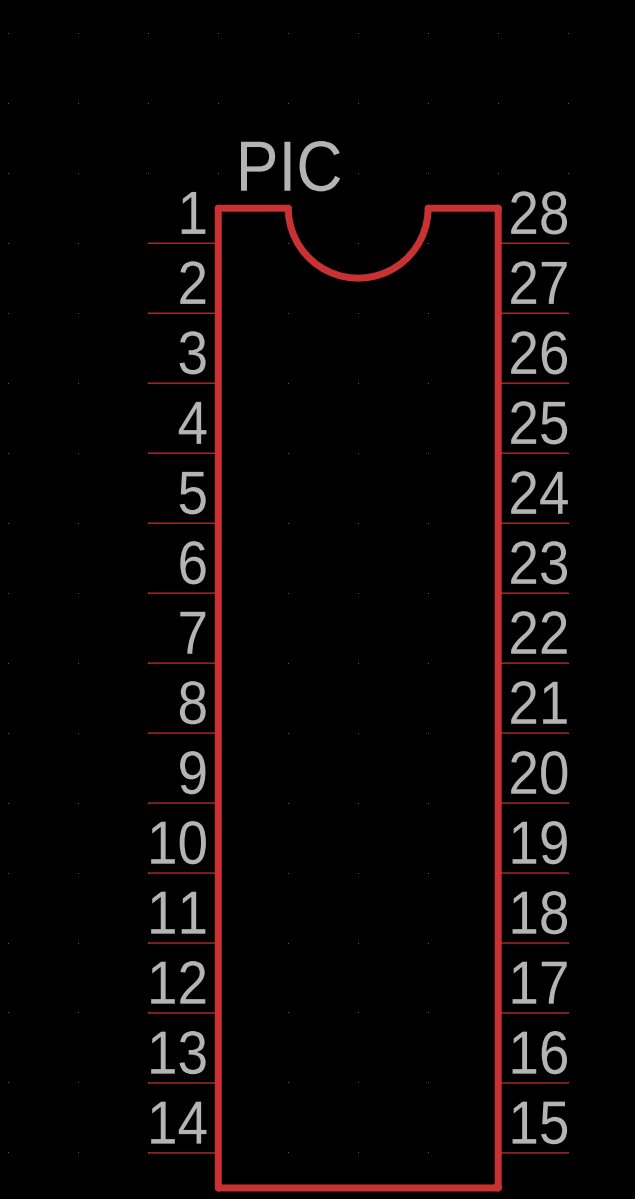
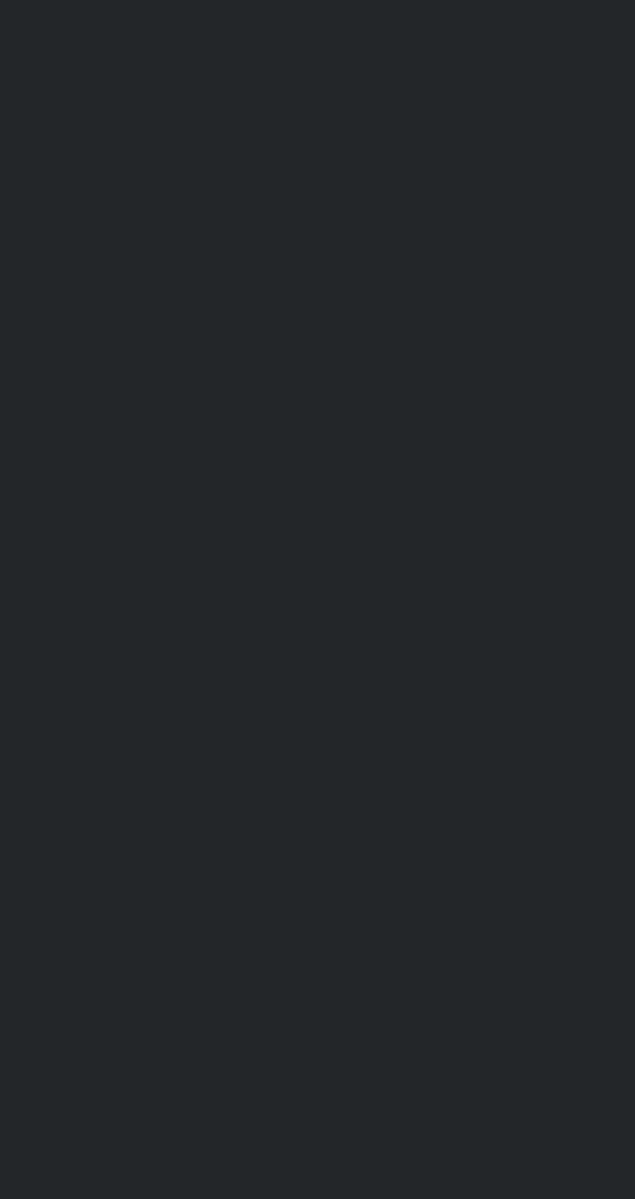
PIC: (358, 698) -> none

